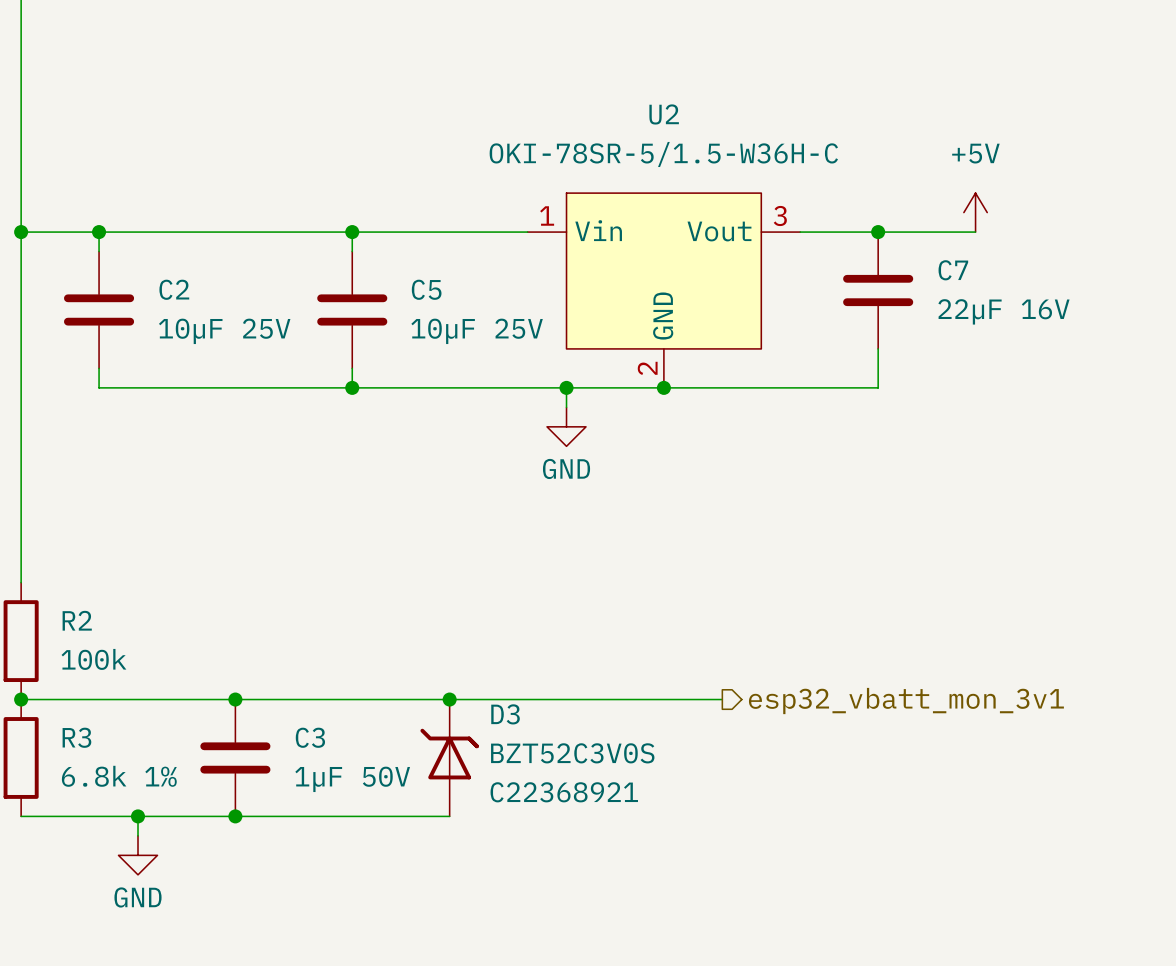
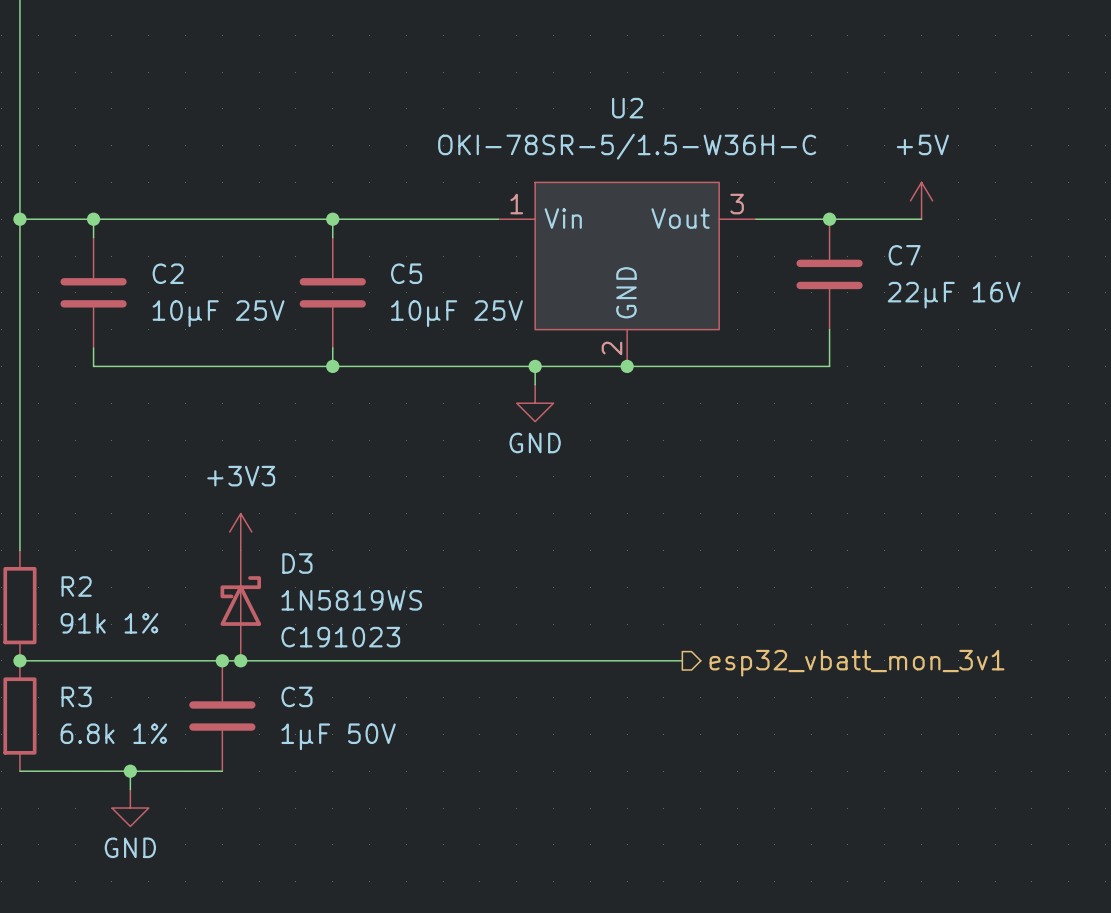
power symbol: none -> +3V3 (240, 532)
R2 value: 100k (93, 659) -> 91k 1% (109, 623)
junction: none -> (240, 660)
D3 symbol: [420, 699, 479, 817] -> [220, 550, 262, 661]
junction: (449, 699) -> none
D3 value: BZT52C3V0S (572, 753) -> 1N5819WS (351, 600)
D3 text: C22368921 (564, 792) -> C191023 (340, 637)
wire: (235, 816) (449, 816) -> none
junction: (235, 816) -> none

